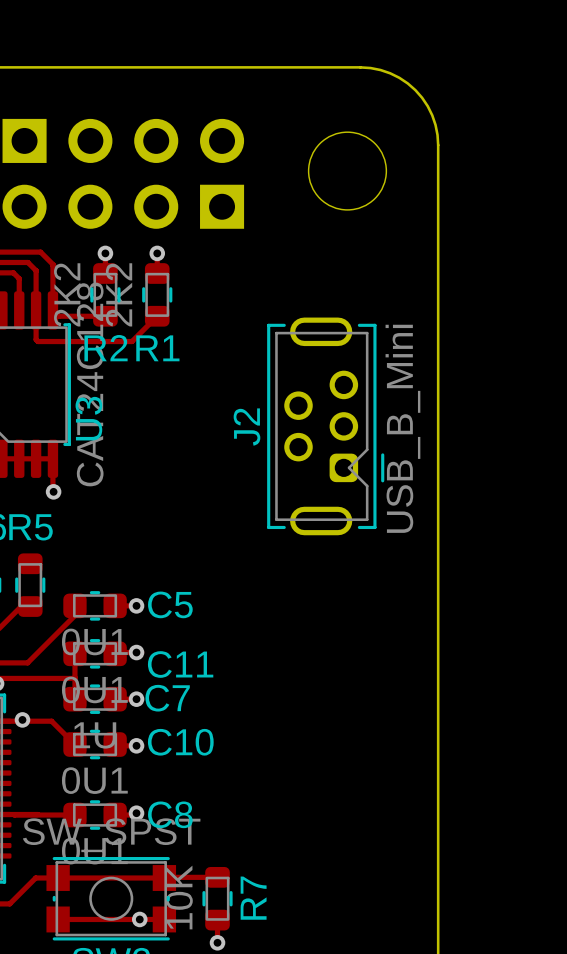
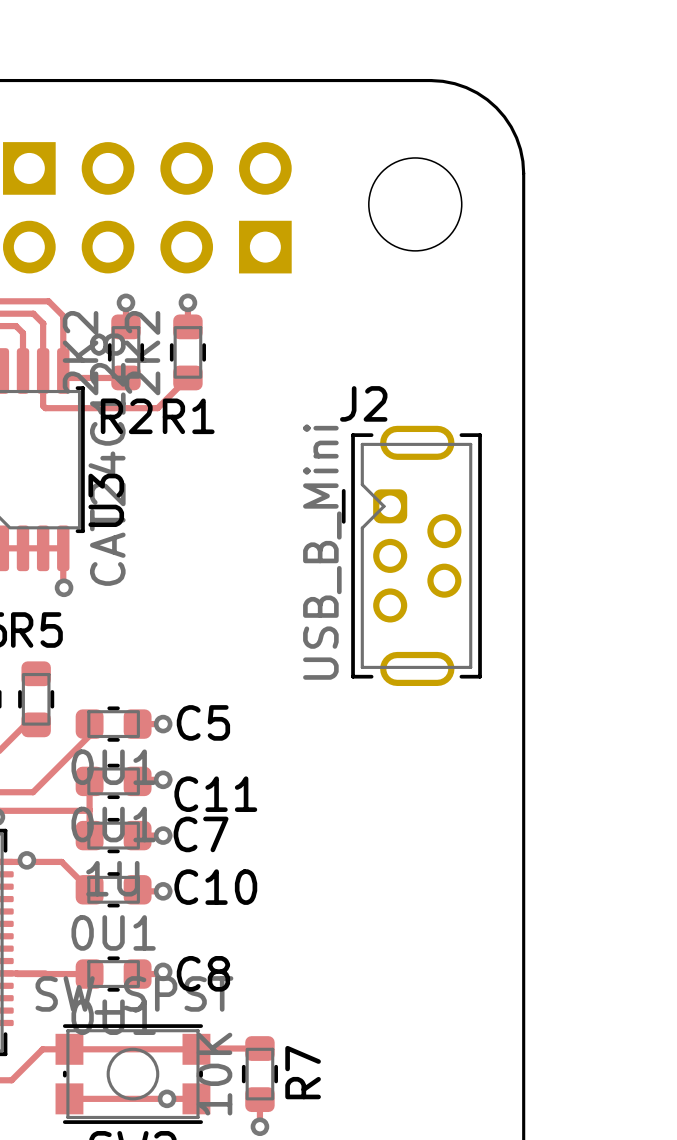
J2 rotation: 0° (325, 426) -> 180° (411, 555)
J2 name position: J2 (246, 427) -> J2 (363, 403)

